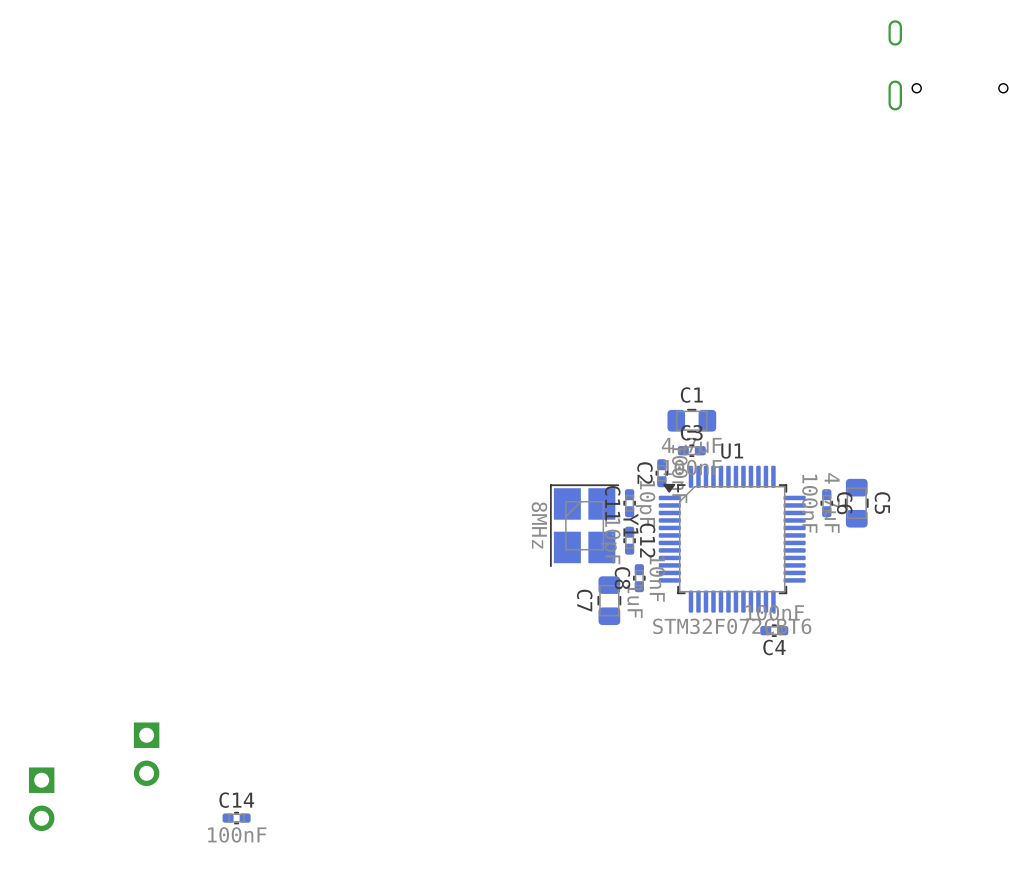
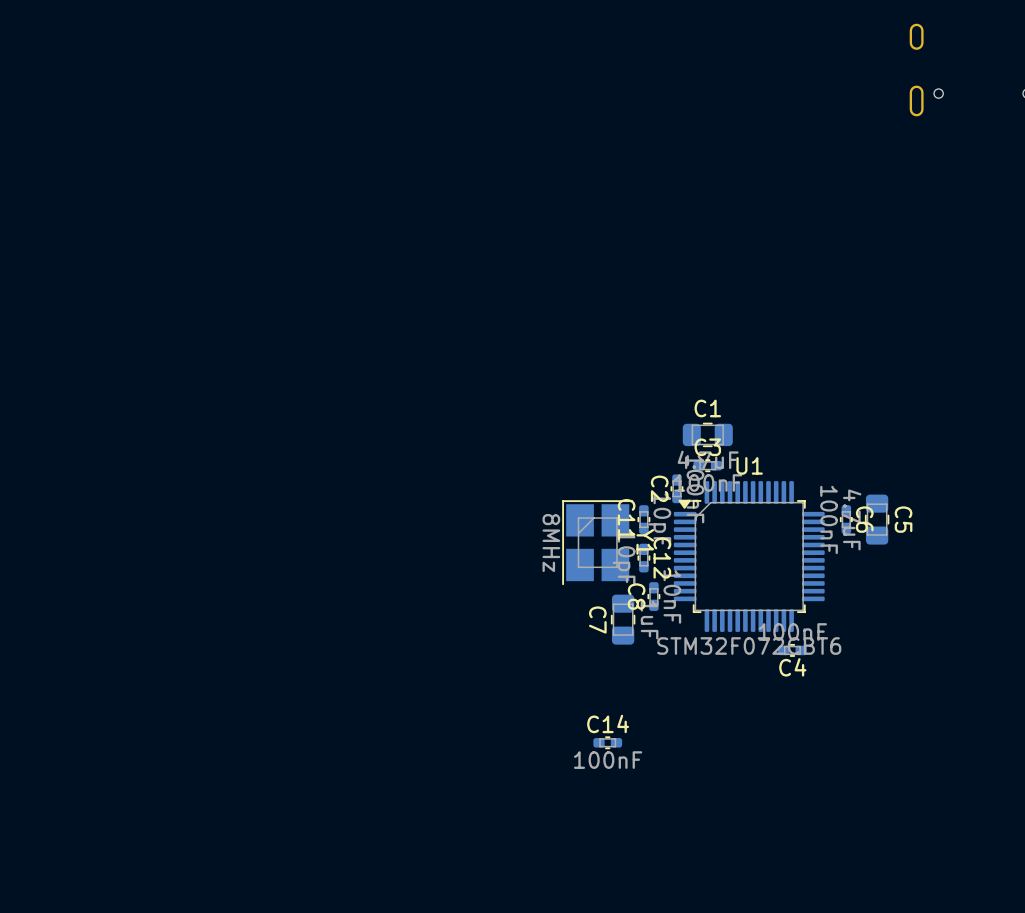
part: (146, 754) -> none
part: (41, 799) -> none
C14 position: (236, 818) -> (607, 742)

